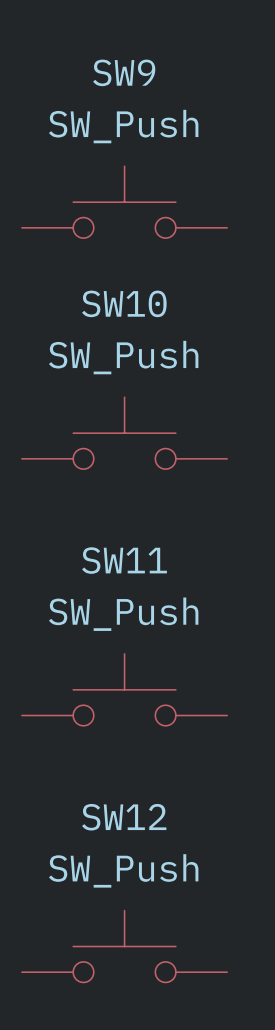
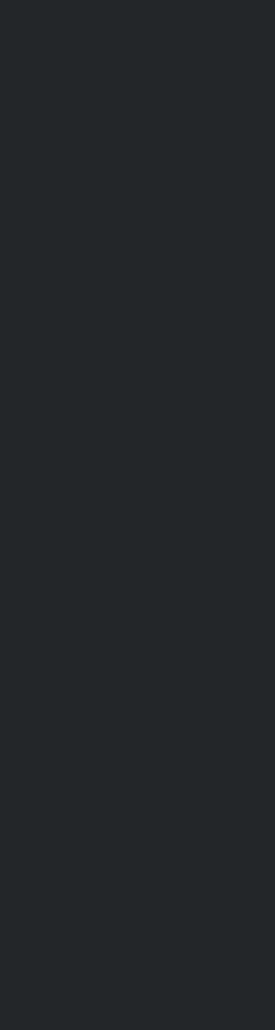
SW9: SW_Push (124, 202) -> none
SW10: SW_Push (124, 433) -> none
SW11: SW_Push (124, 689) -> none
SW12: SW_Push (124, 946) -> none

